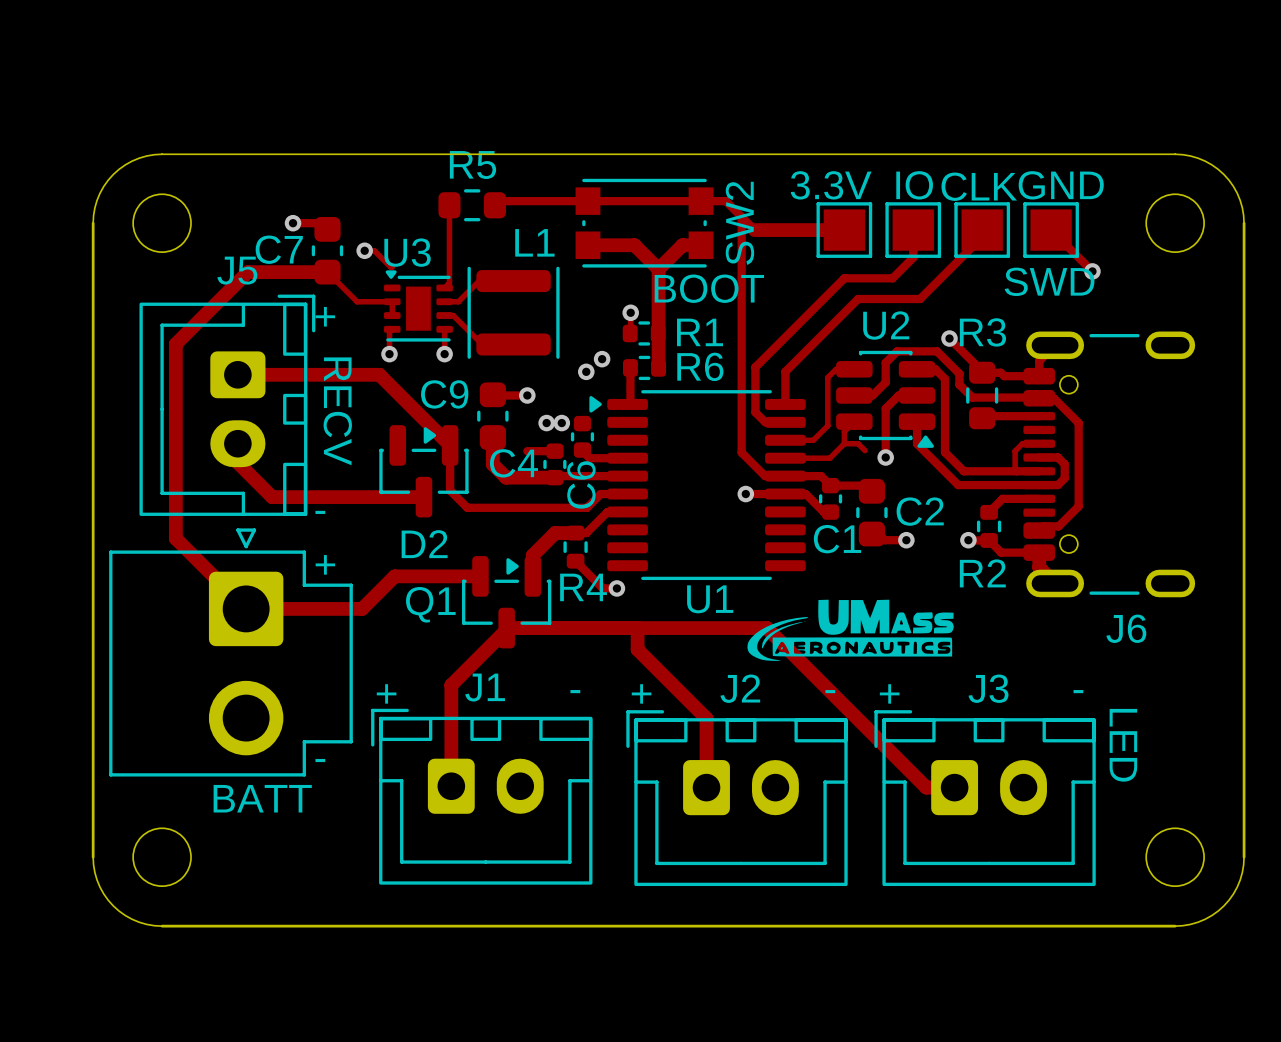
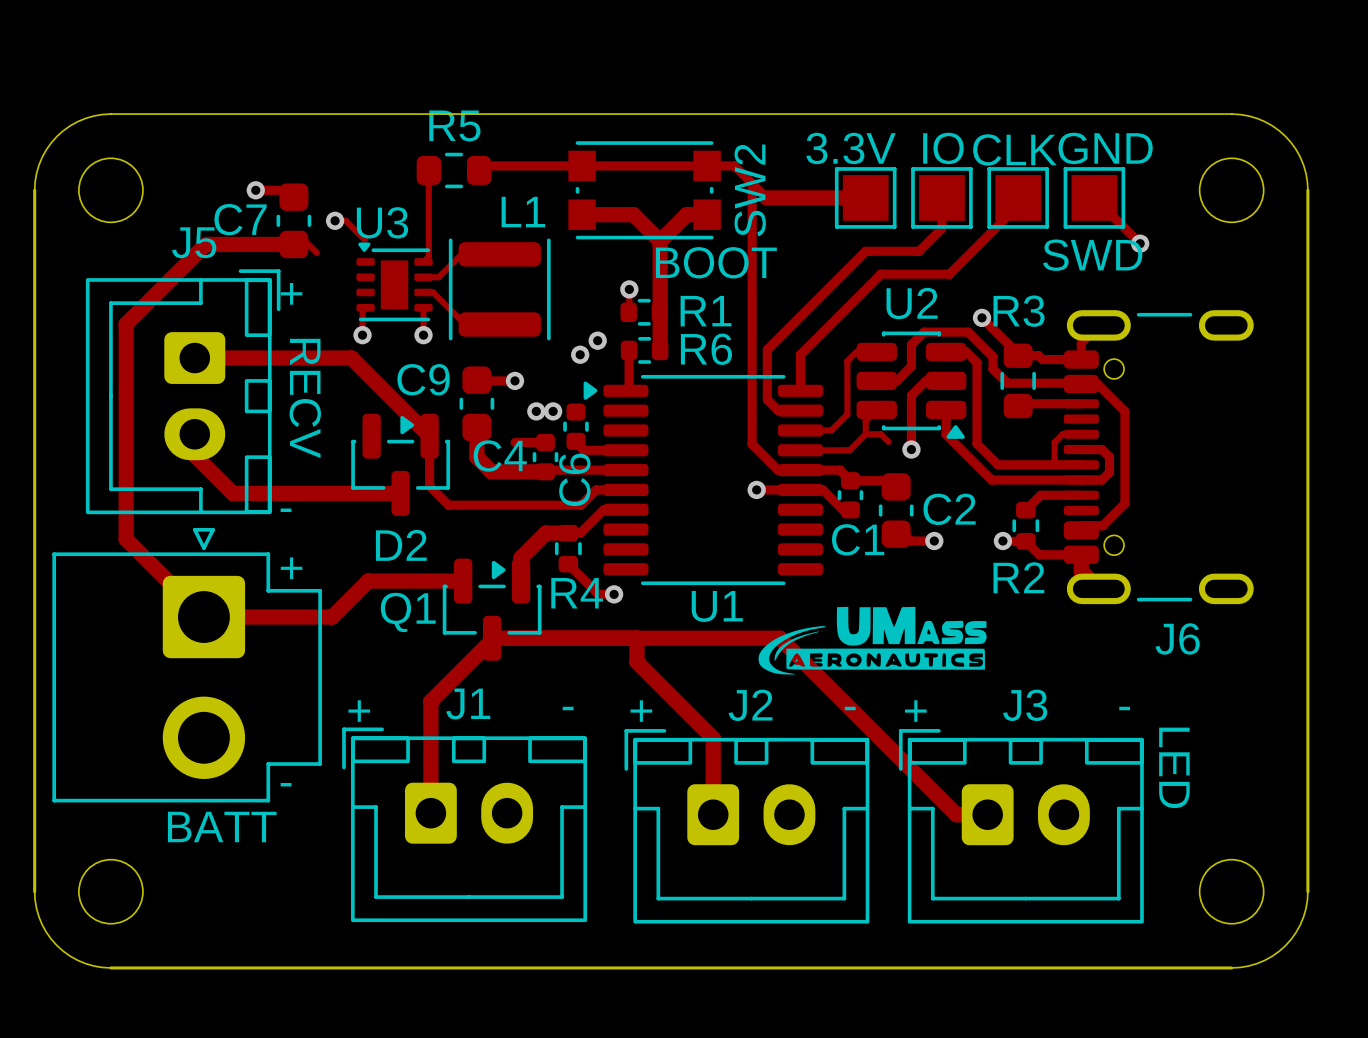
track: (327, 272) (357, 301) (392, 301) (392, 315) -> (293, 244) (299, 239) (303, 239) (316, 252)

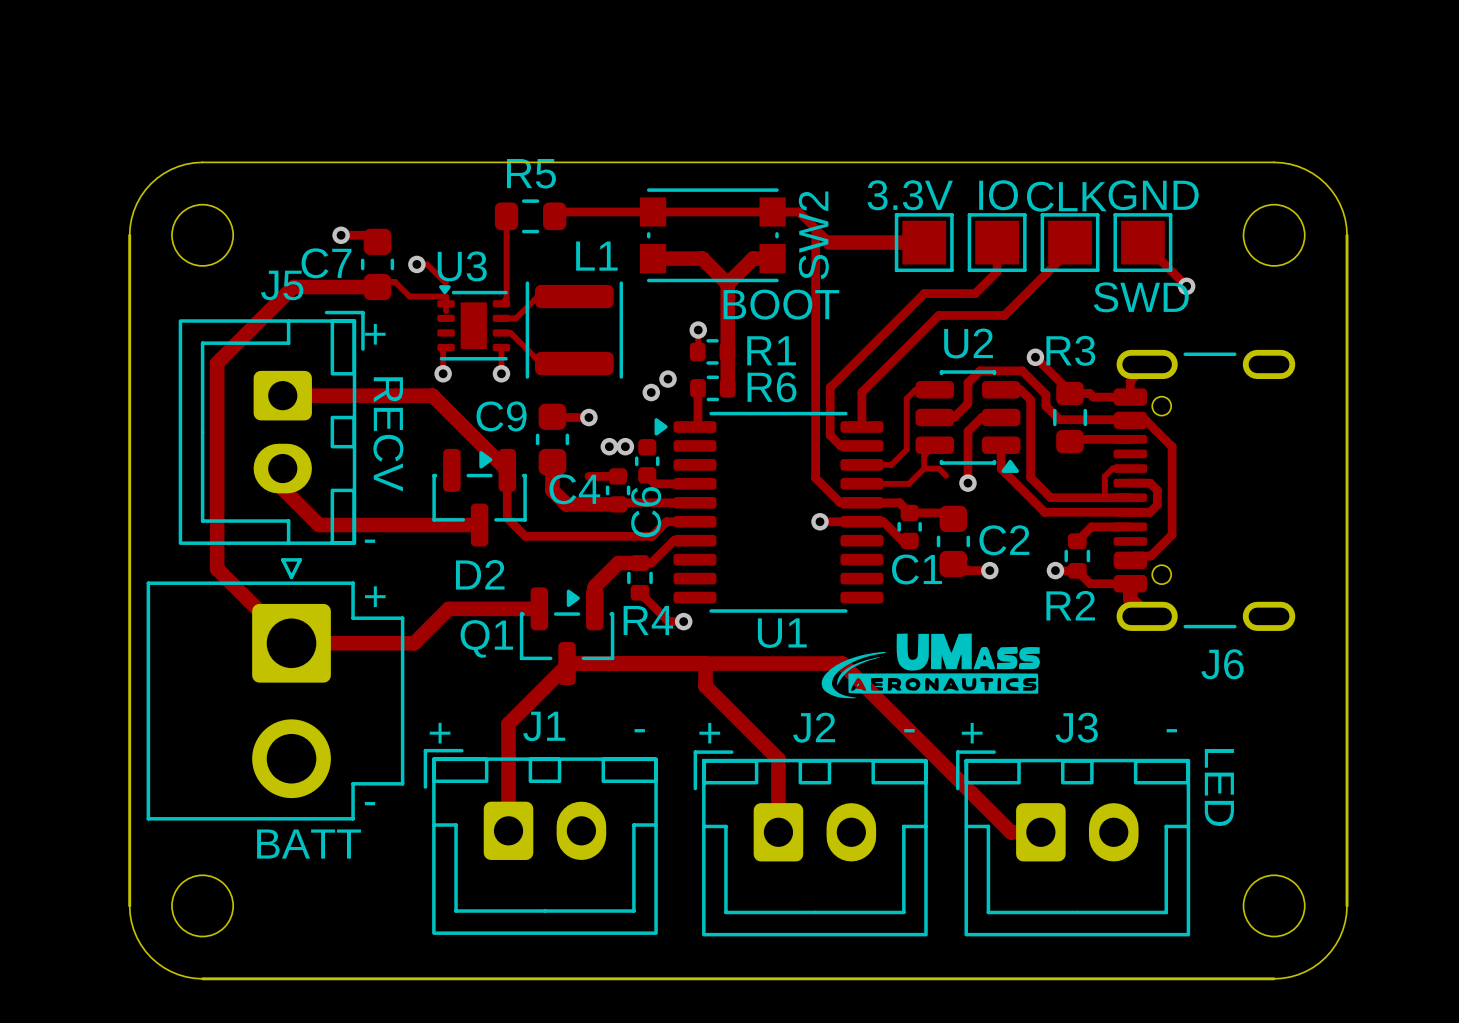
track: (303, 239) (316, 252) -> (386, 281) (395, 281) (409, 296) (446, 296) (446, 311)

